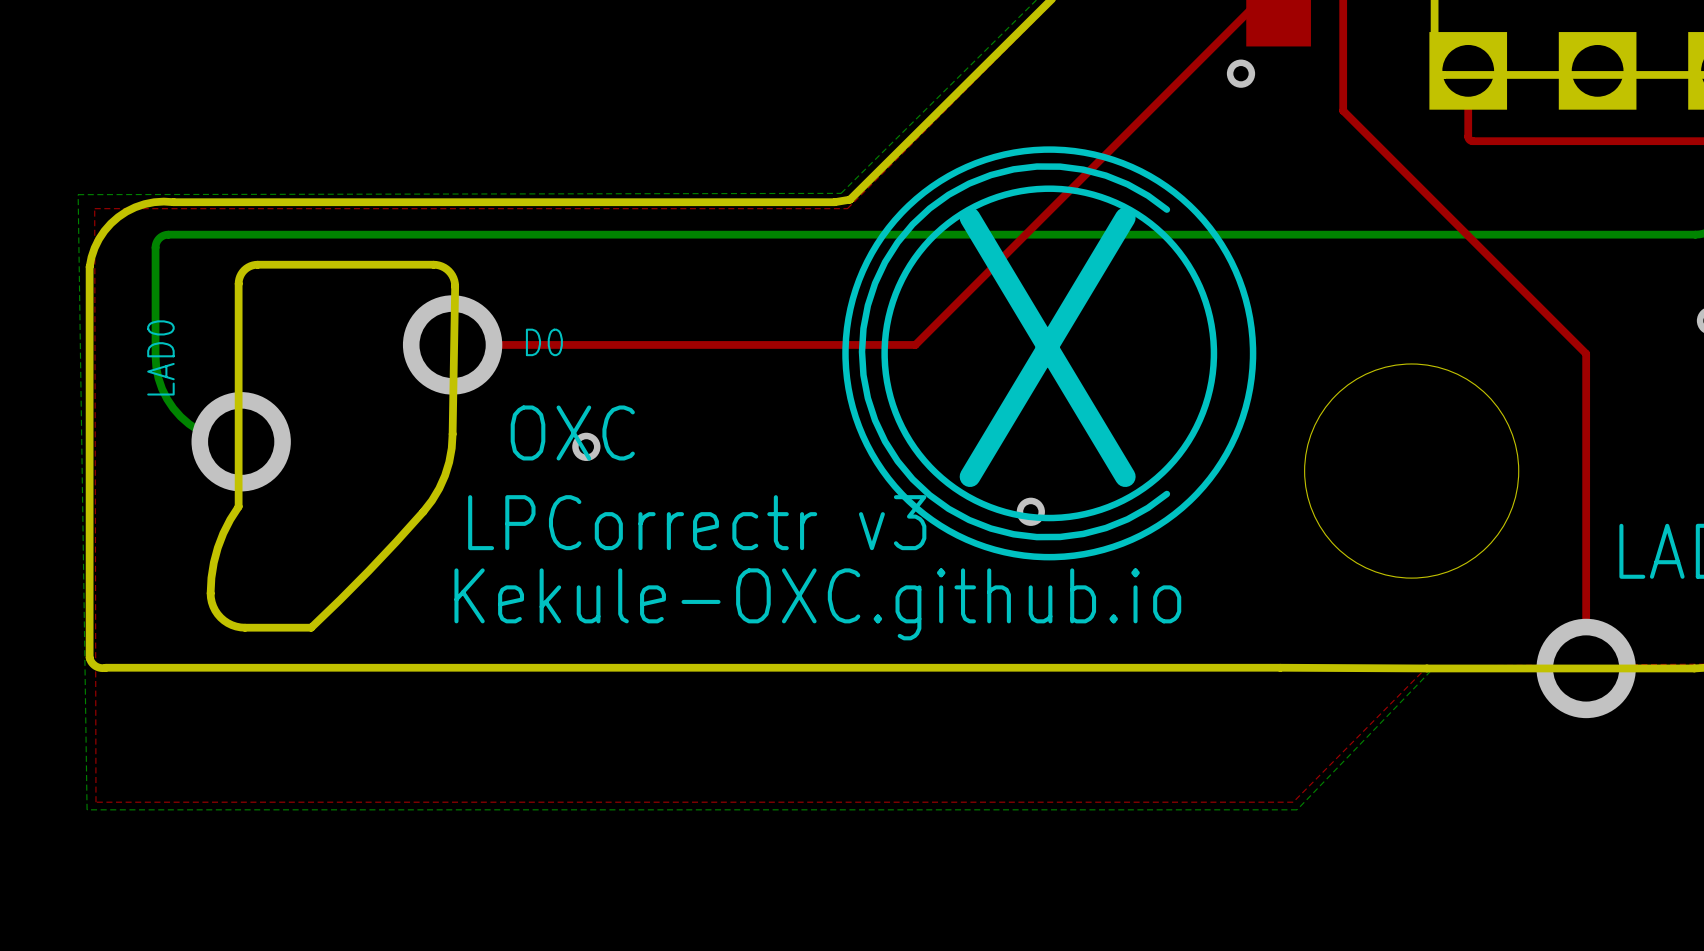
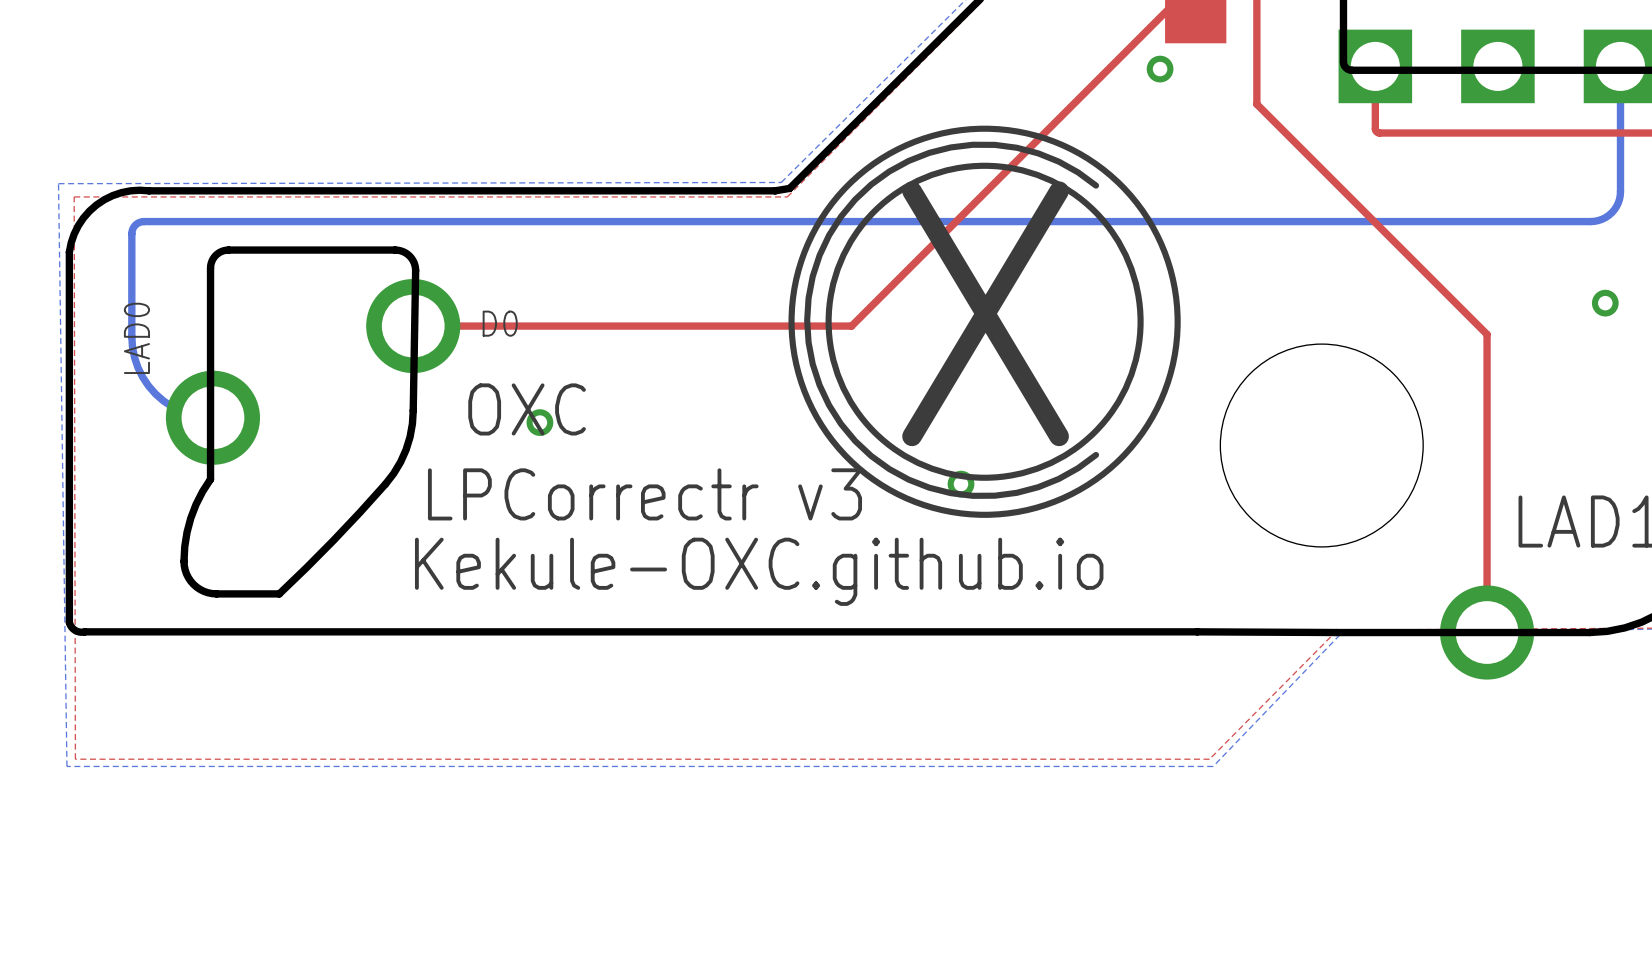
drawing shape: [842, 146, 1257, 561] -> [788, 125, 1181, 518]

